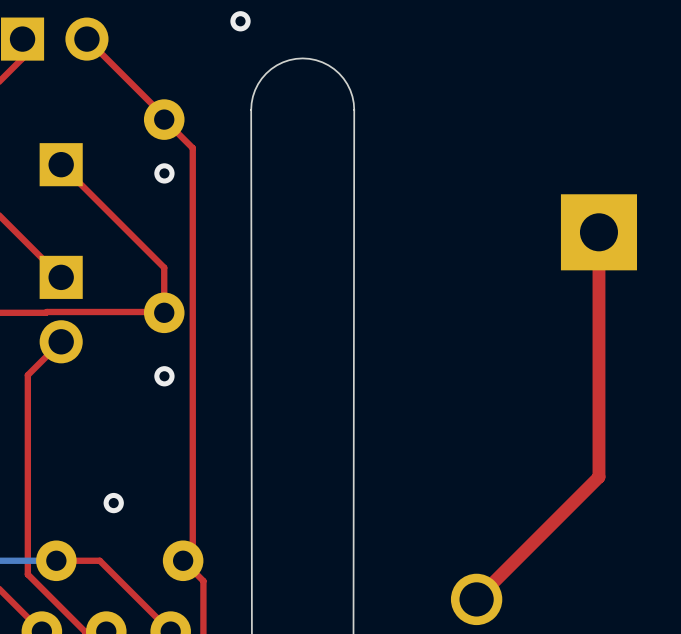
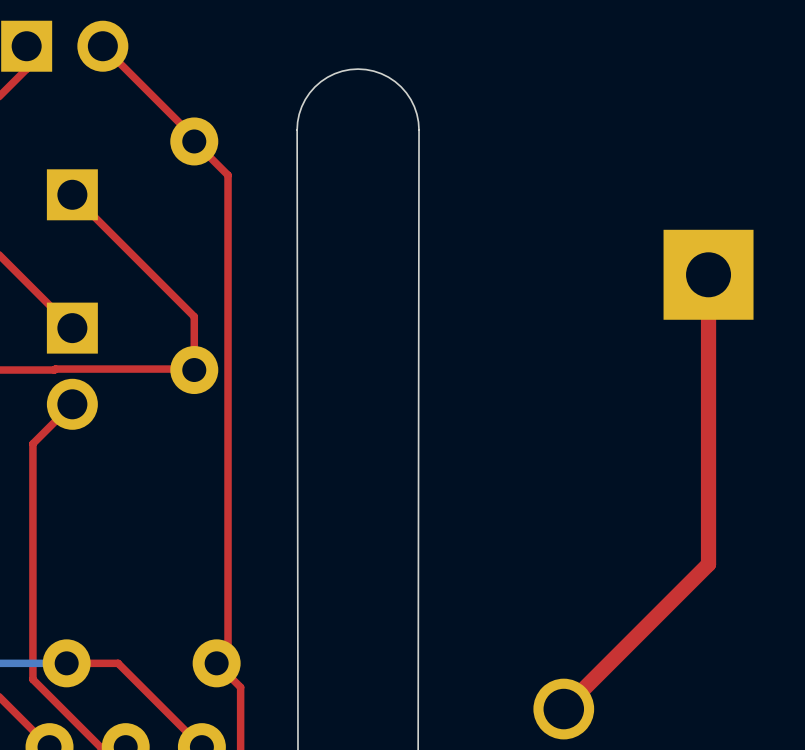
via: (240, 21) -> none
via: (164, 173) -> none
via: (164, 376) -> none
via: (113, 503) -> none

